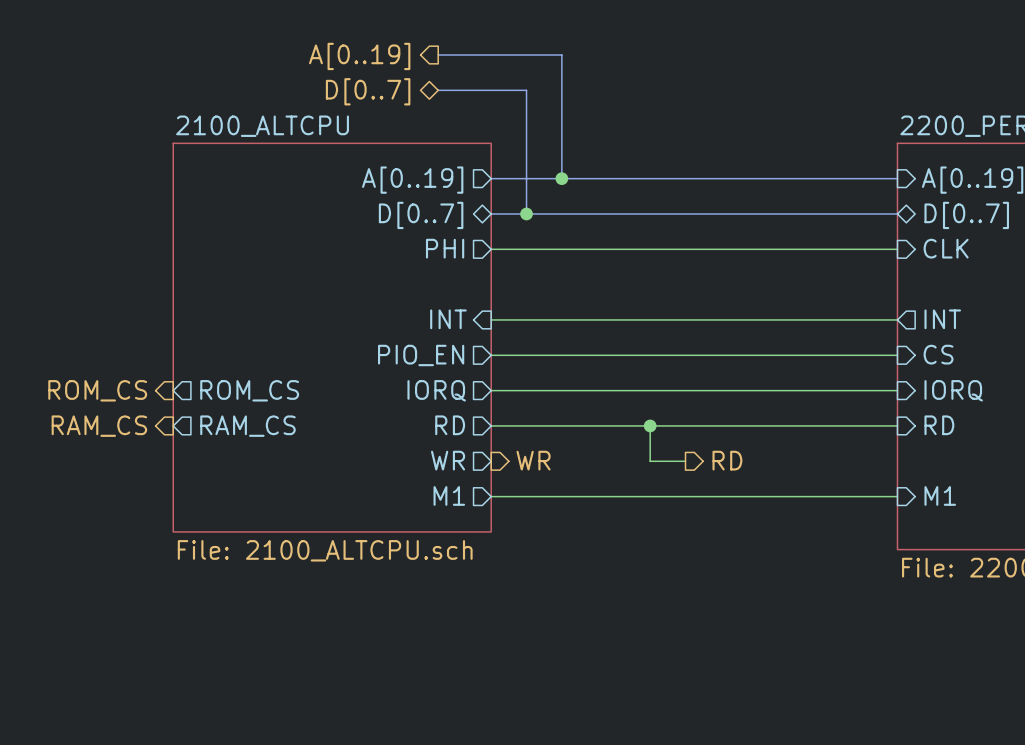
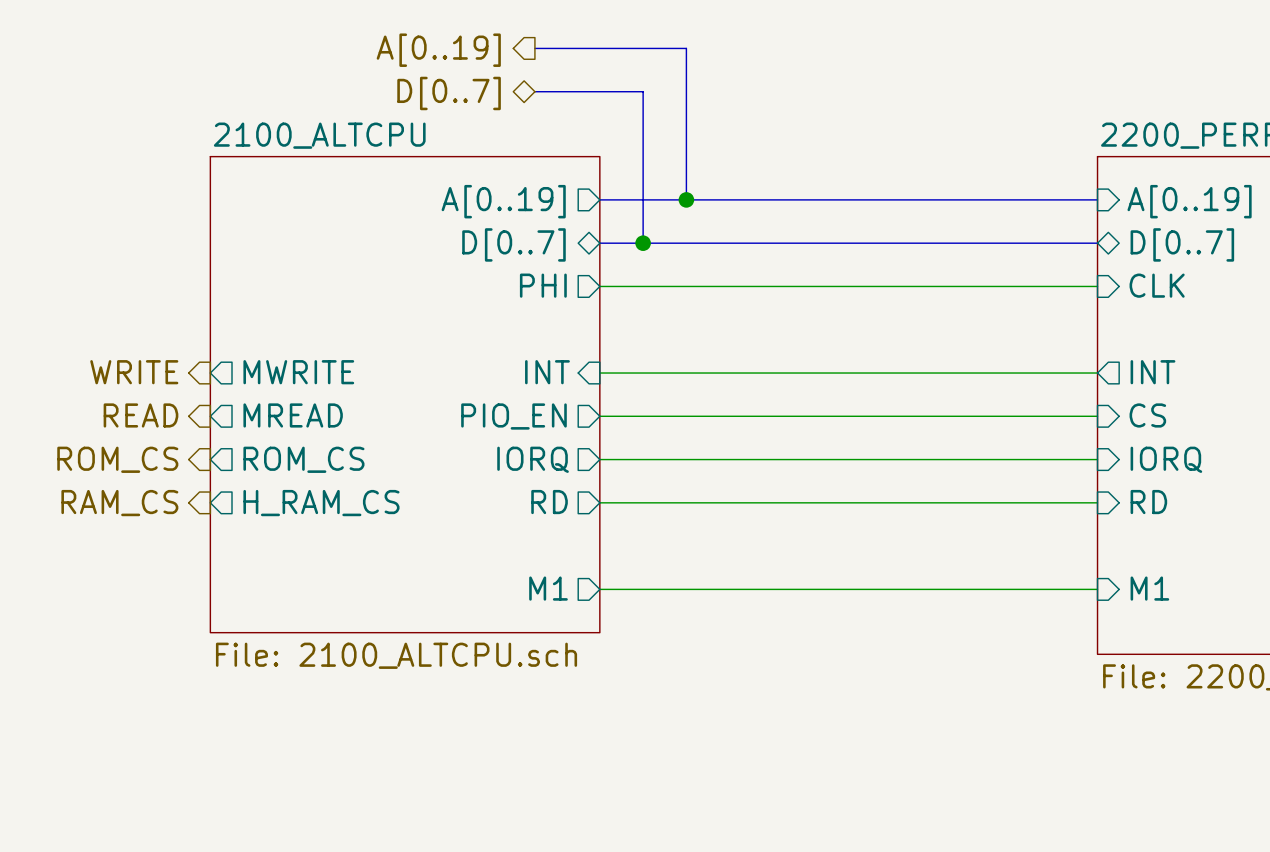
hierarchical label: none -> WRITE (134, 372)
sheet pin: none -> MWRITE (298, 372)
hierarchical label: none -> READ (140, 415)
sheet pin: none -> MREAD (293, 415)
wire: (650, 425) (650, 461) (685, 461) -> none
junction: (650, 425) -> none
sheet pin: RAM_CS (247, 426) -> H_RAM_CS (321, 503)
sheet pin: WR (448, 460) -> none
hierarchical label: WR (533, 460) -> none
hierarchical label: RD (727, 460) -> none

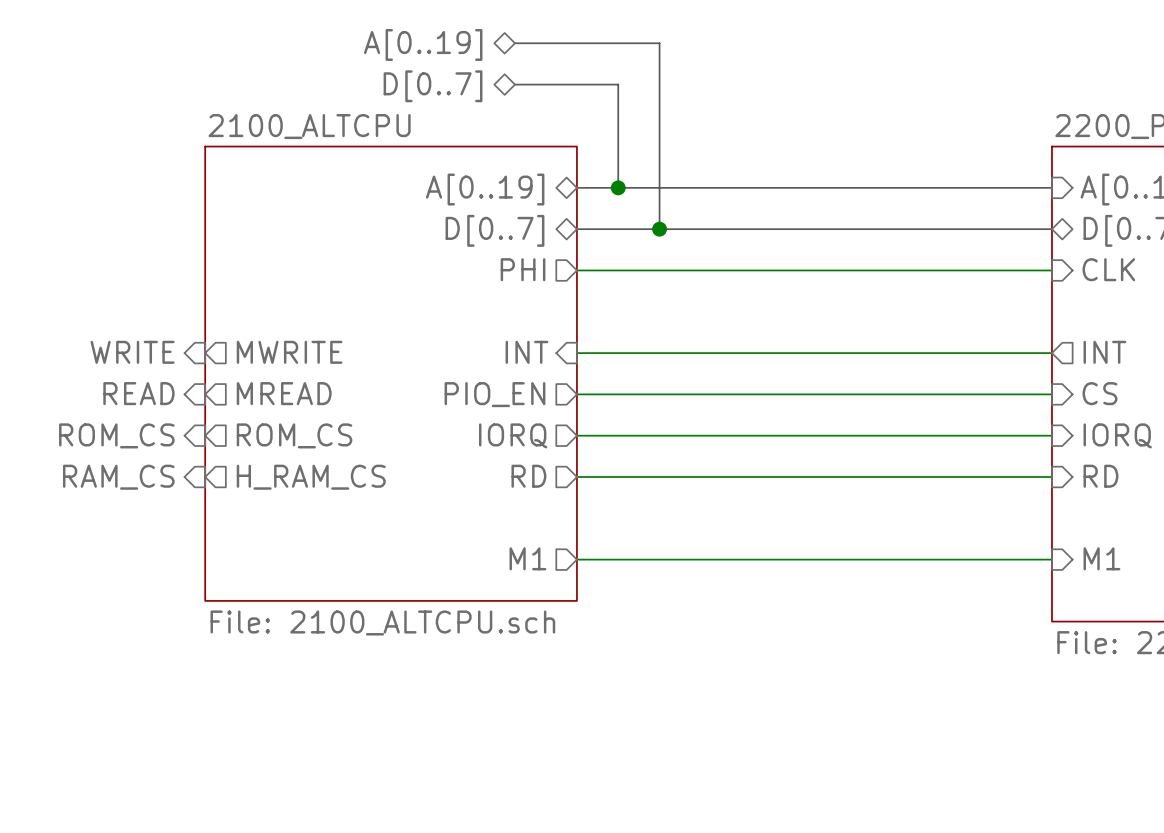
hierarchical label shape: output (438, 50) -> bidirectional (423, 44)
bus: (643, 199) (643, 243) -> (659, 187) (659, 229)
junction: none -> (618, 187)
junction: (686, 199) -> none
sheet pin shape: output (503, 201) -> bidirectional (485, 189)
junction: (643, 243) -> none
junction: none -> (659, 229)

